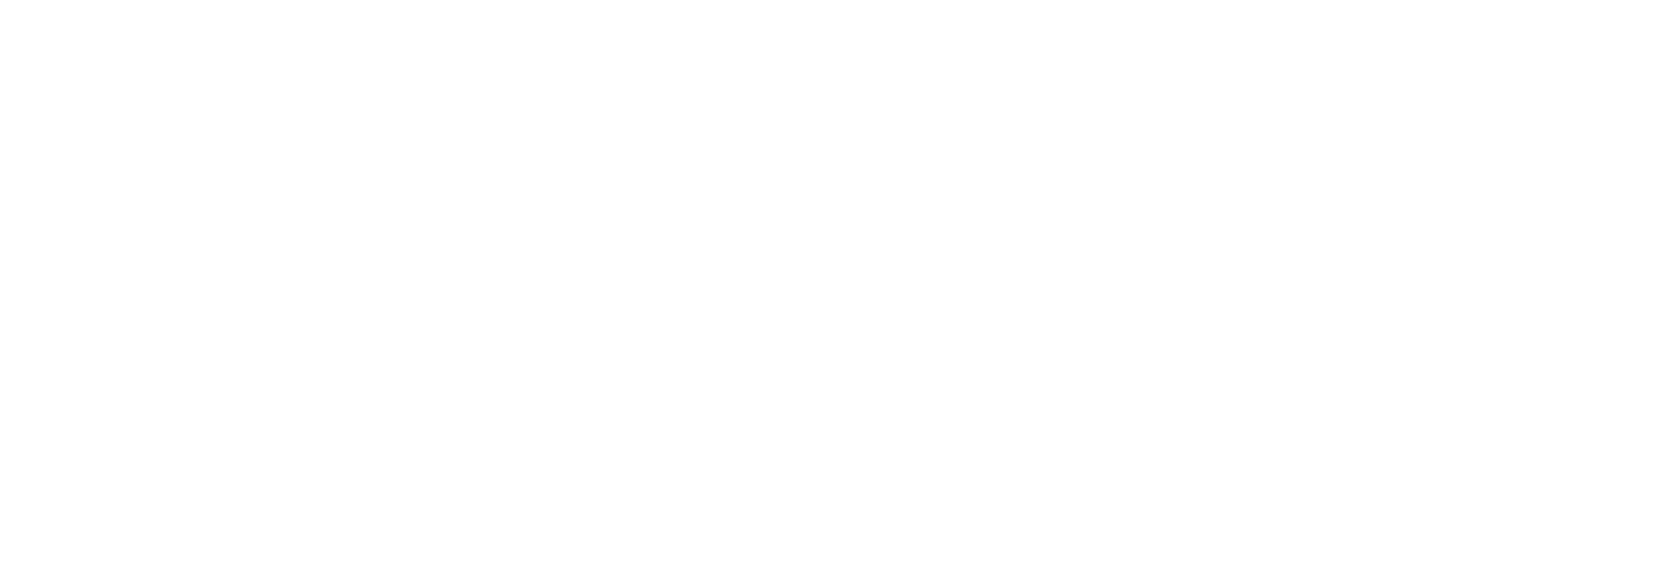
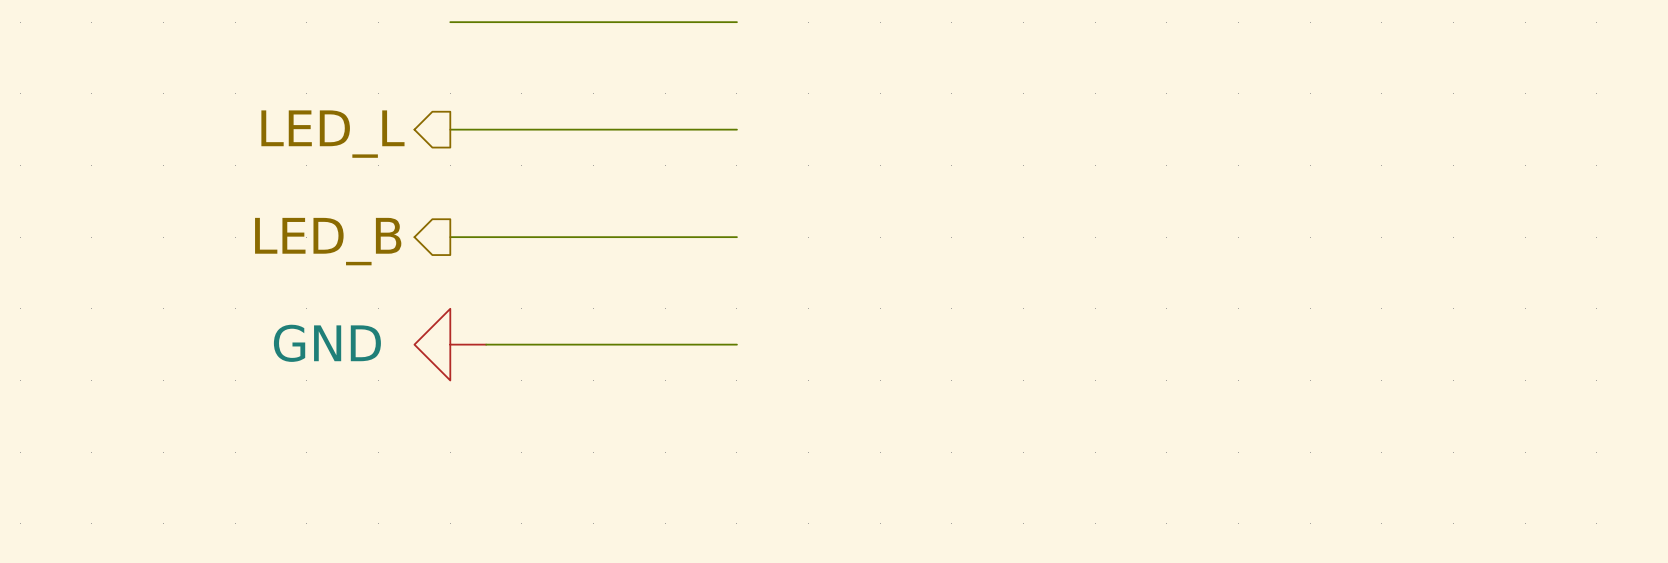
wire: none -> (450, 22) (736, 22)
wire: none -> (450, 129) (736, 129)
hierarchical label: none -> LED_L (332, 134)
hierarchical label: none -> LED_B (328, 241)
wire: none -> (450, 237) (736, 237)
power symbol: none -> GND (450, 344)
wire: none -> (486, 344) (736, 344)

